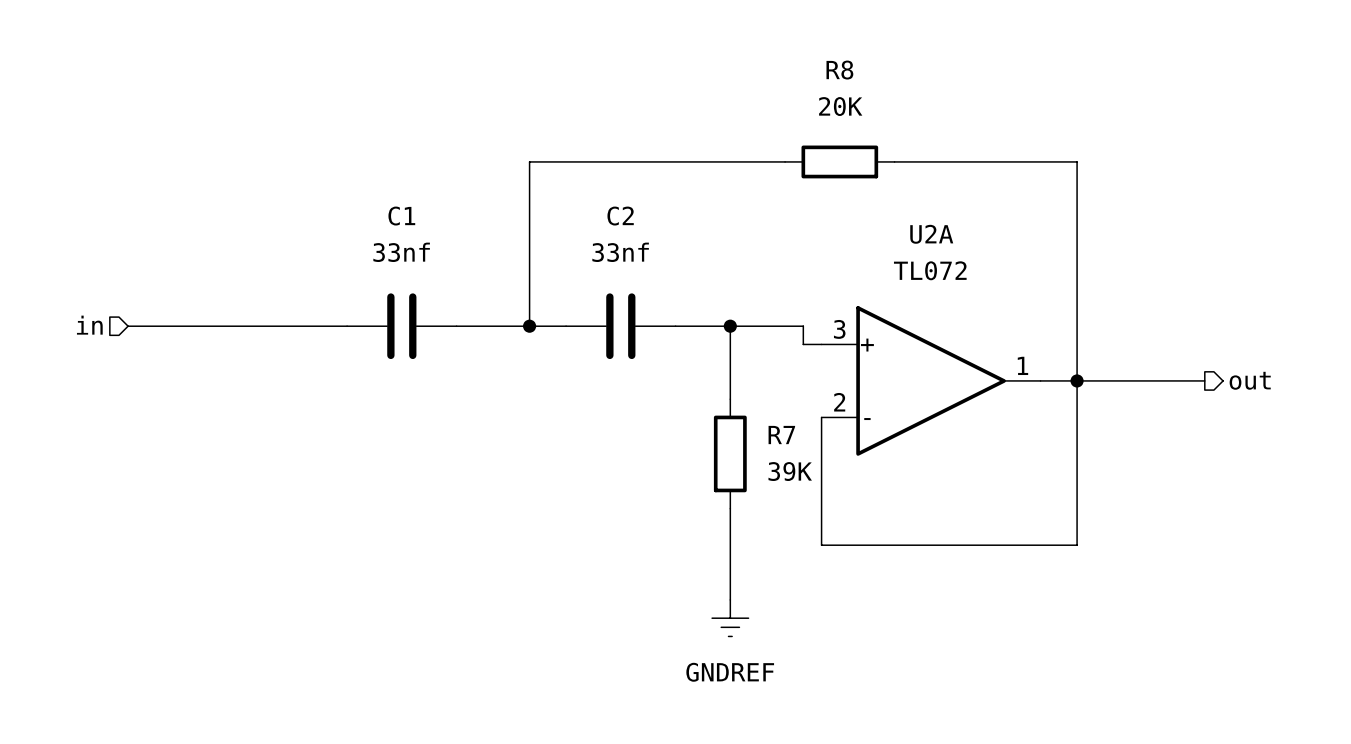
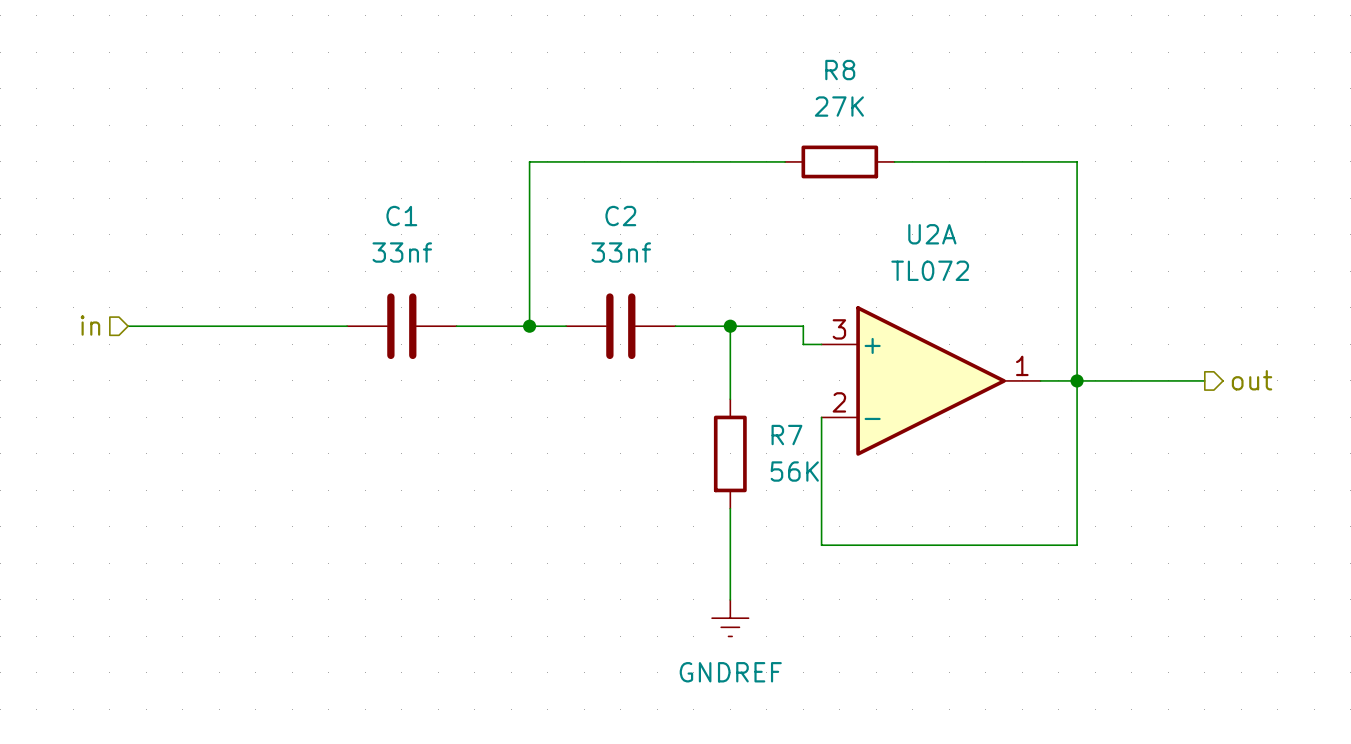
R8 value: 20K (840, 106) -> 27K (839, 106)
R7 value: 39K (790, 471) -> 56K (794, 471)

